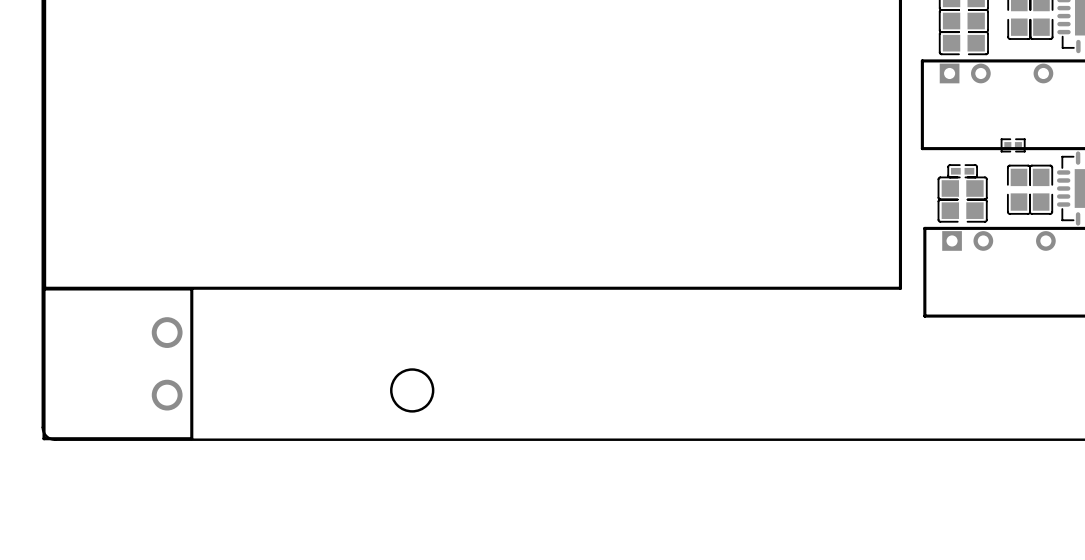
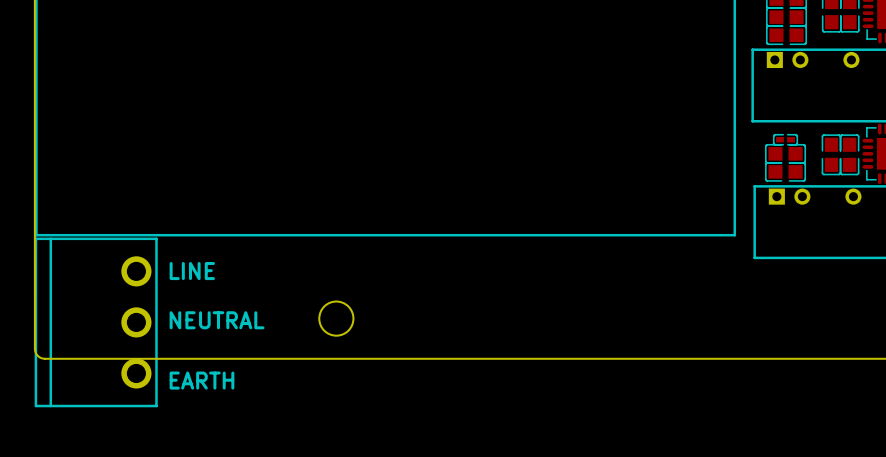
part: (1013, 145) -> none
text: none -> LINE (192, 271)
part: (117, 363) -> none
text: none -> NEUTRAL (217, 320)
part: none -> (96, 322)
text: none -> EARTH (201, 380)

